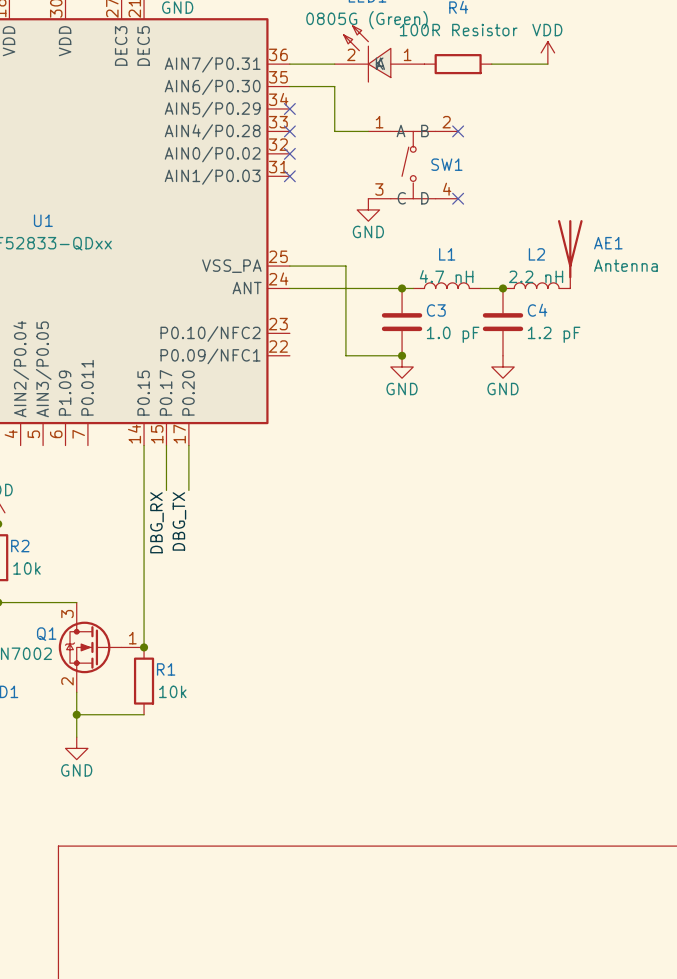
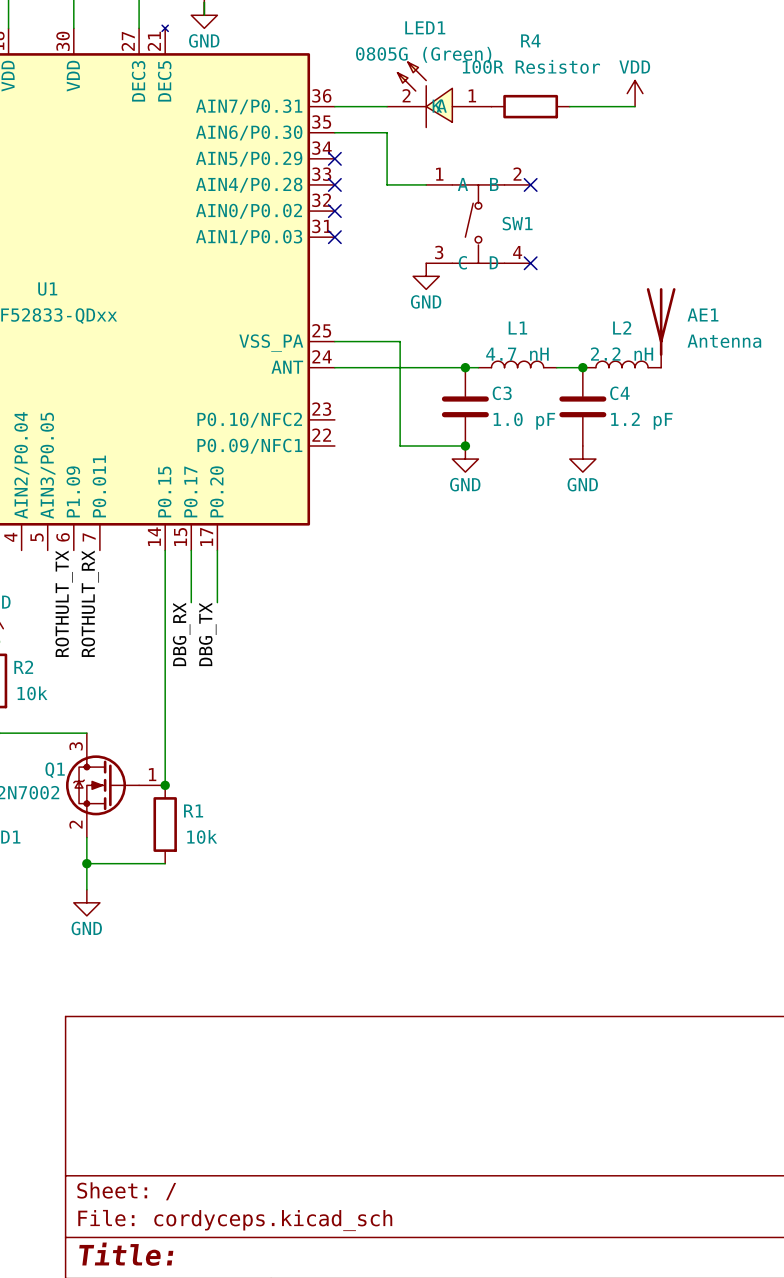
label: none -> ROTHULT_TX (64, 603)
label: none -> ROTHULT_RX (90, 603)

